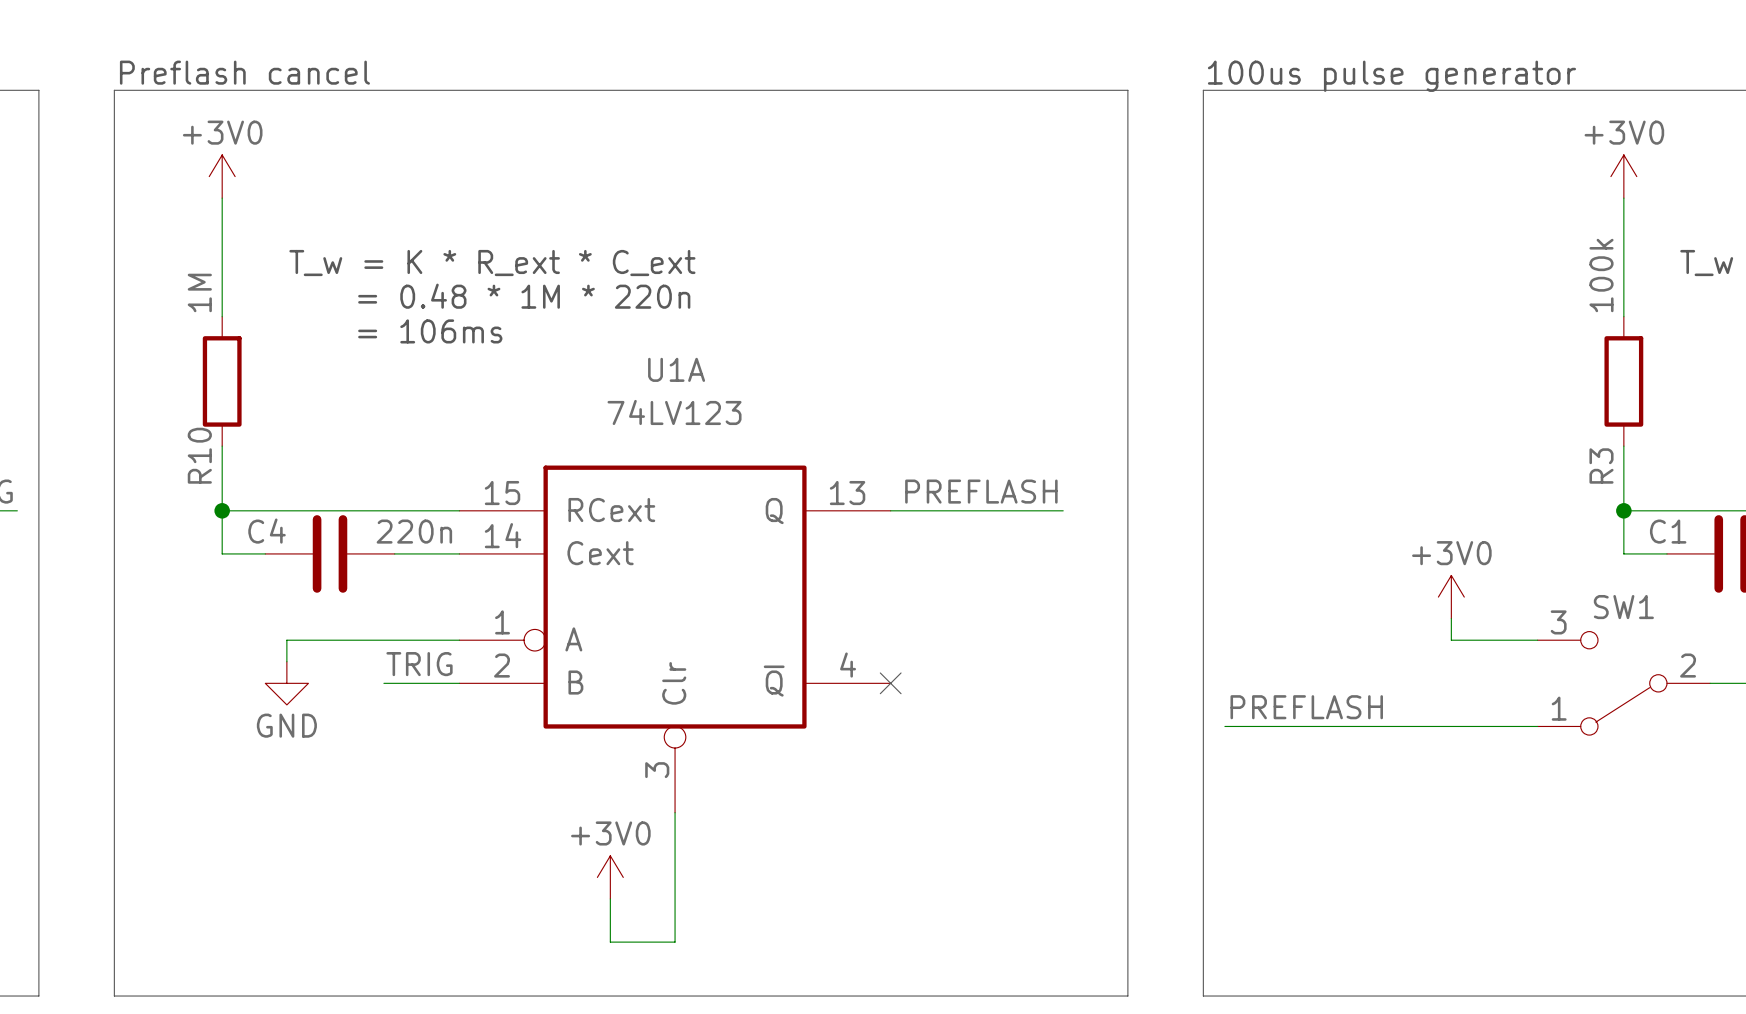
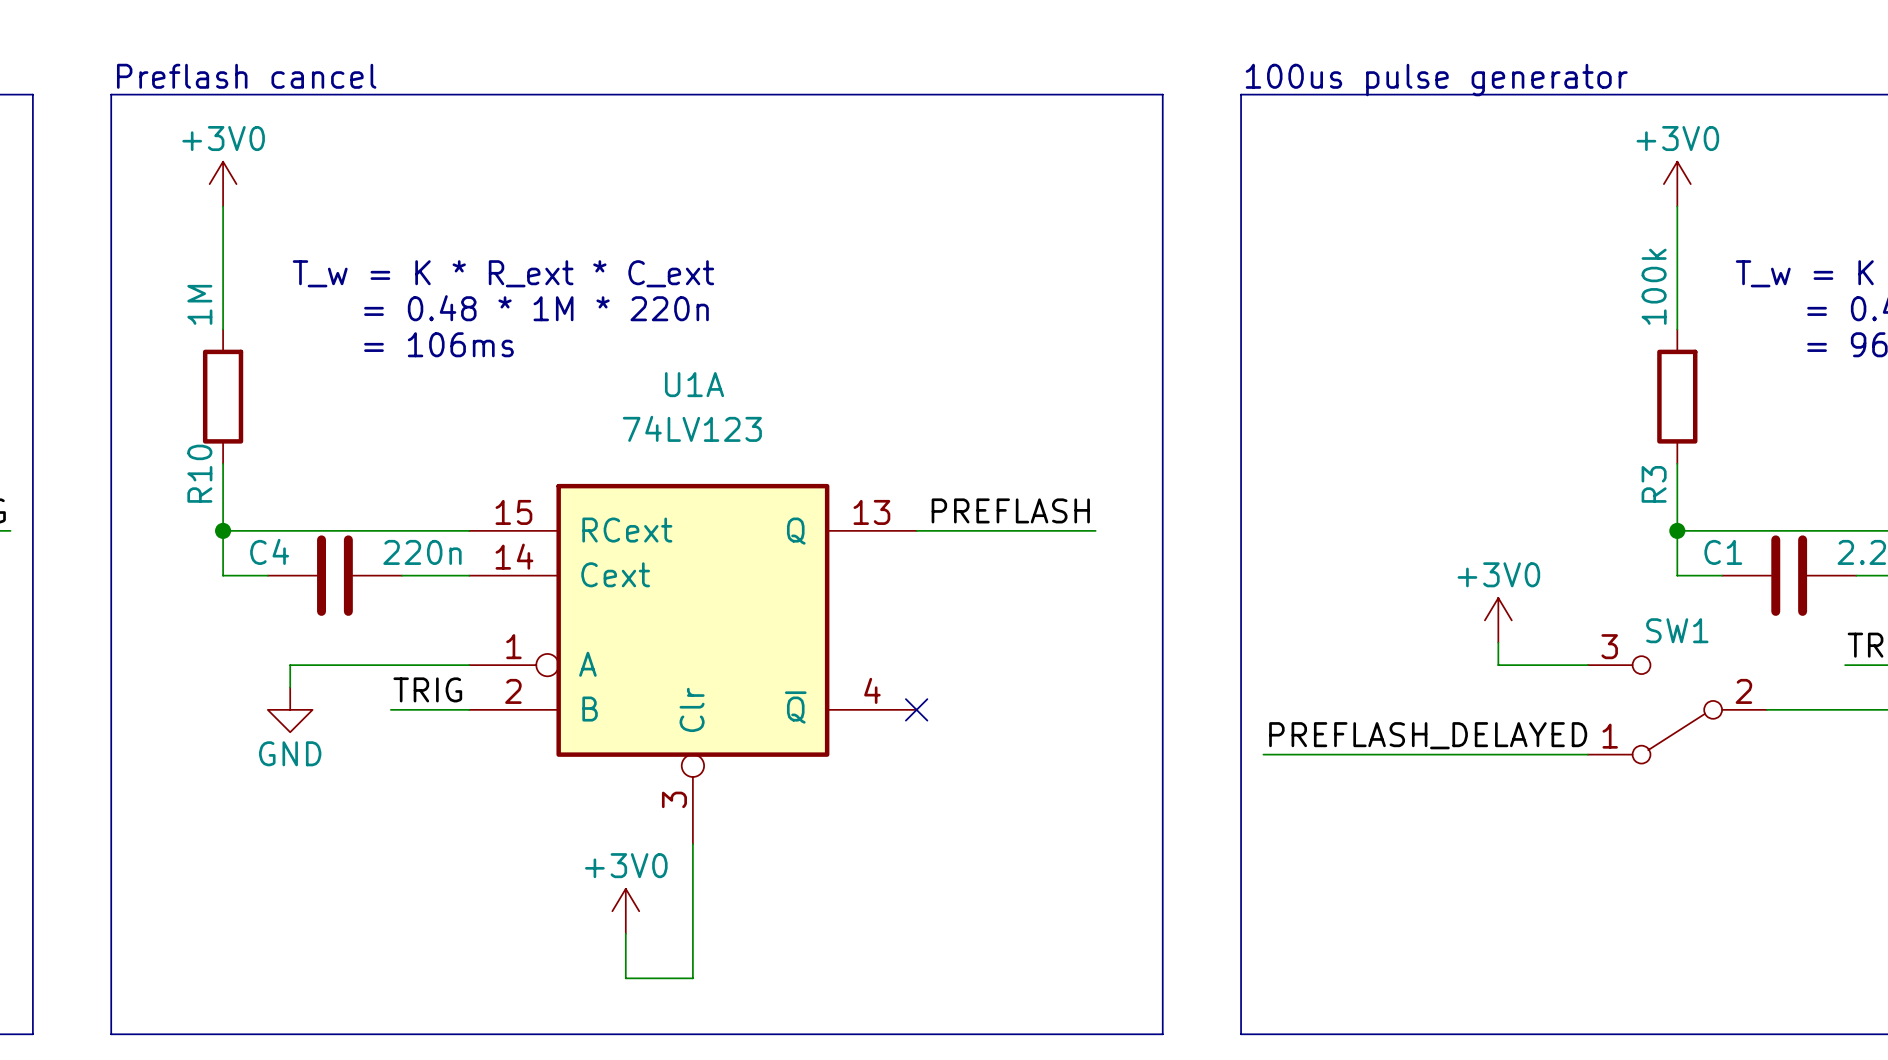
label: PREFLASH (1306, 707) -> PREFLASH_DELAYED (1428, 735)

